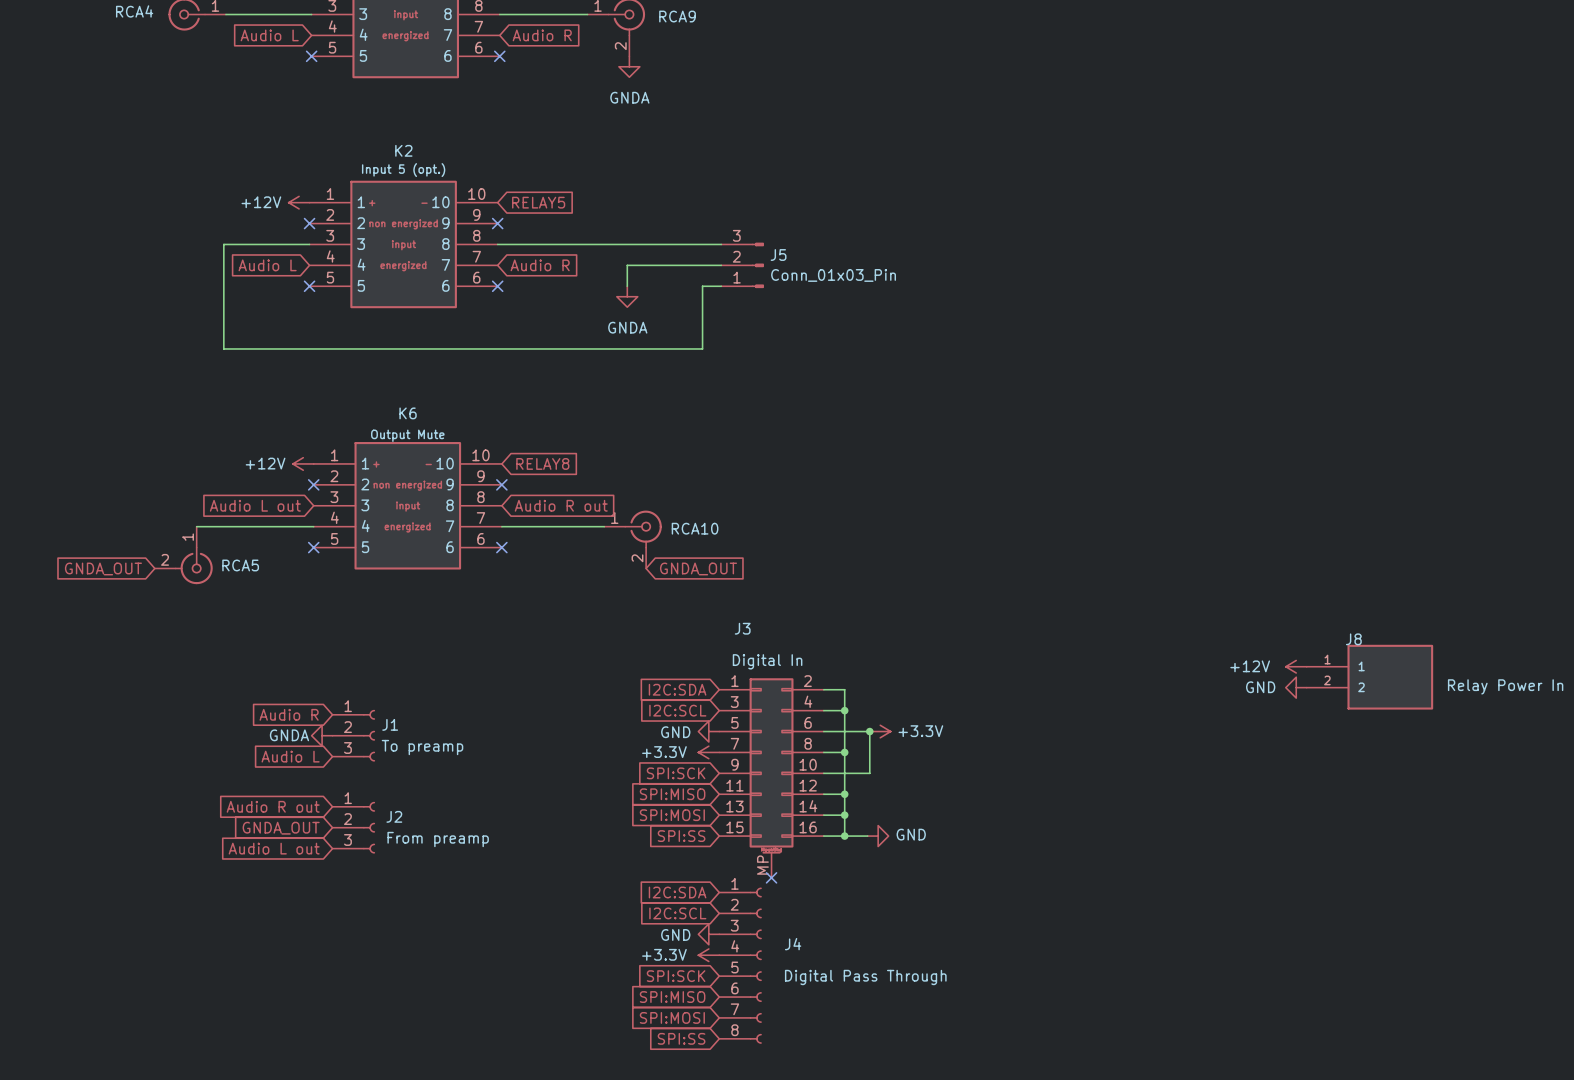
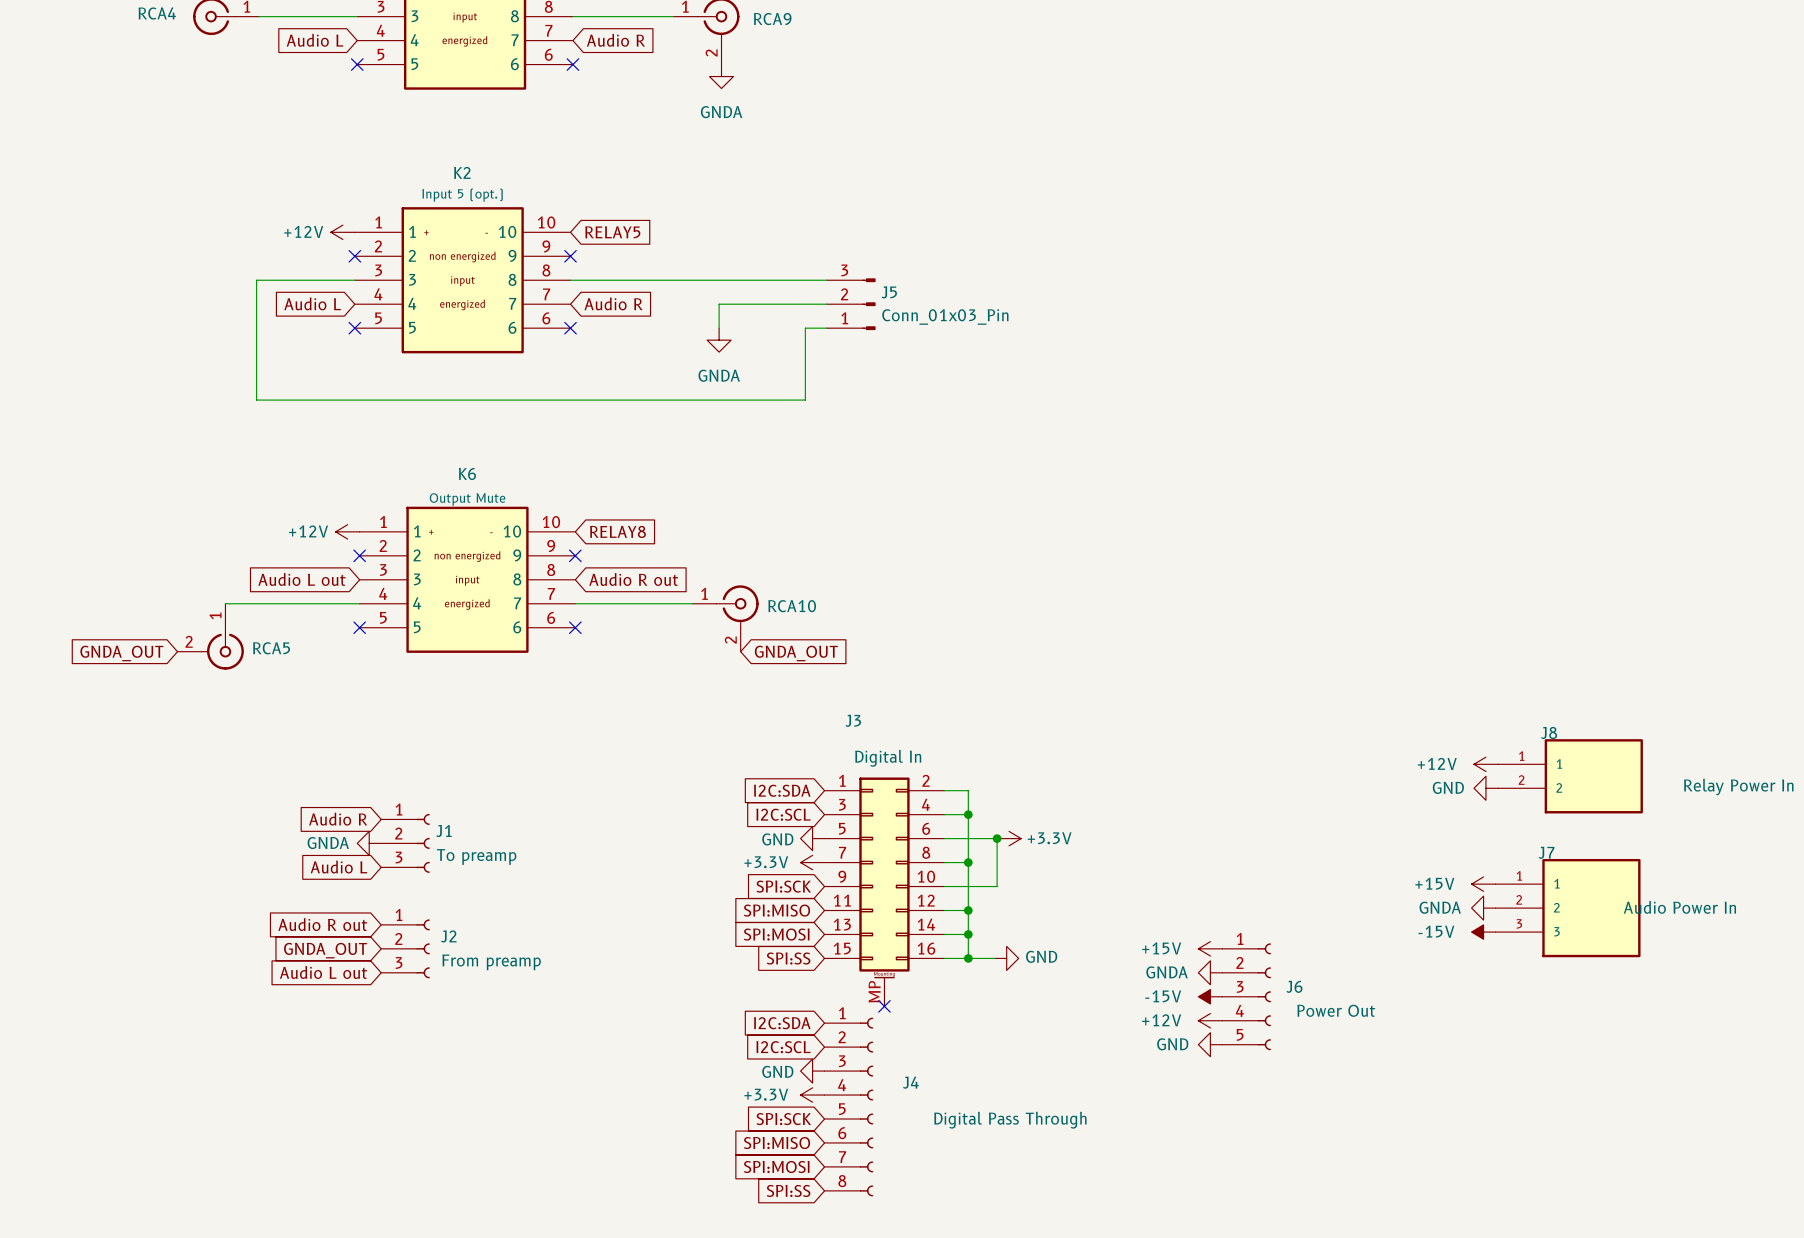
power symbol: none -> +15V (1483, 884)
power symbol: none -> GNDA (1483, 908)
J7: none -> Audio Power In (1568, 908)
power symbol: none -> -15V (1483, 932)
power symbol: none -> +15V (1210, 948)
power symbol: none -> GNDA (1210, 972)
power symbol: none -> -15V (1210, 996)
J6: none -> Power Out (1246, 996)
power symbol: none -> +12V (1210, 1020)
power symbol: none -> GND (1210, 1044)

